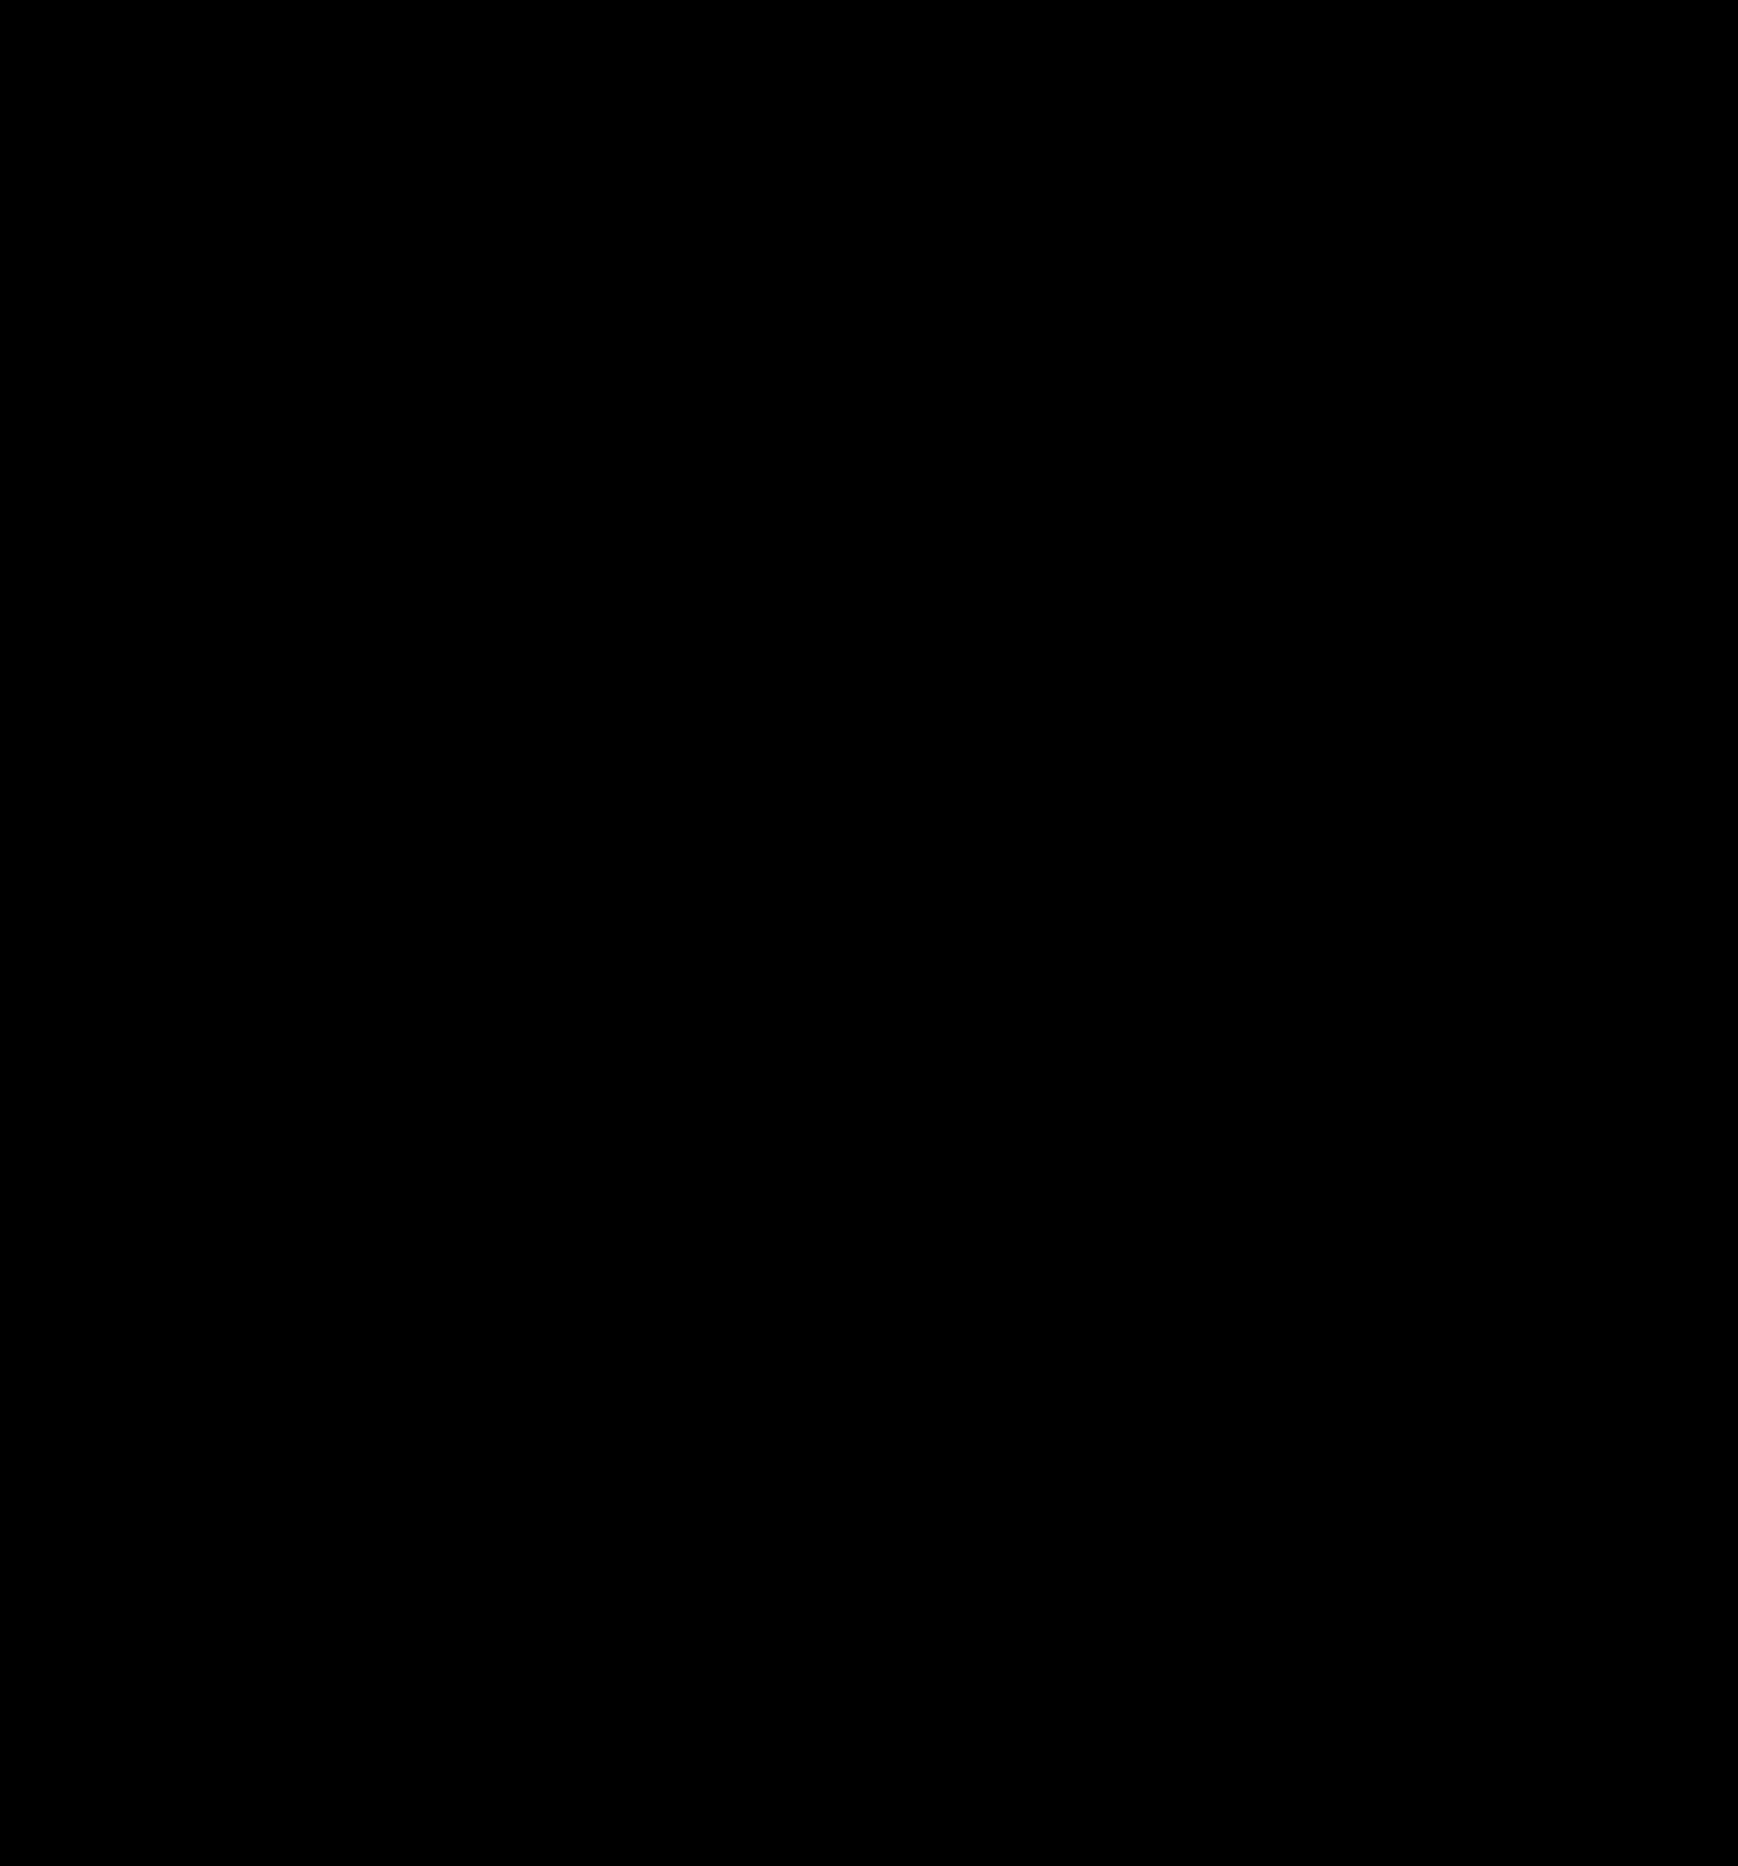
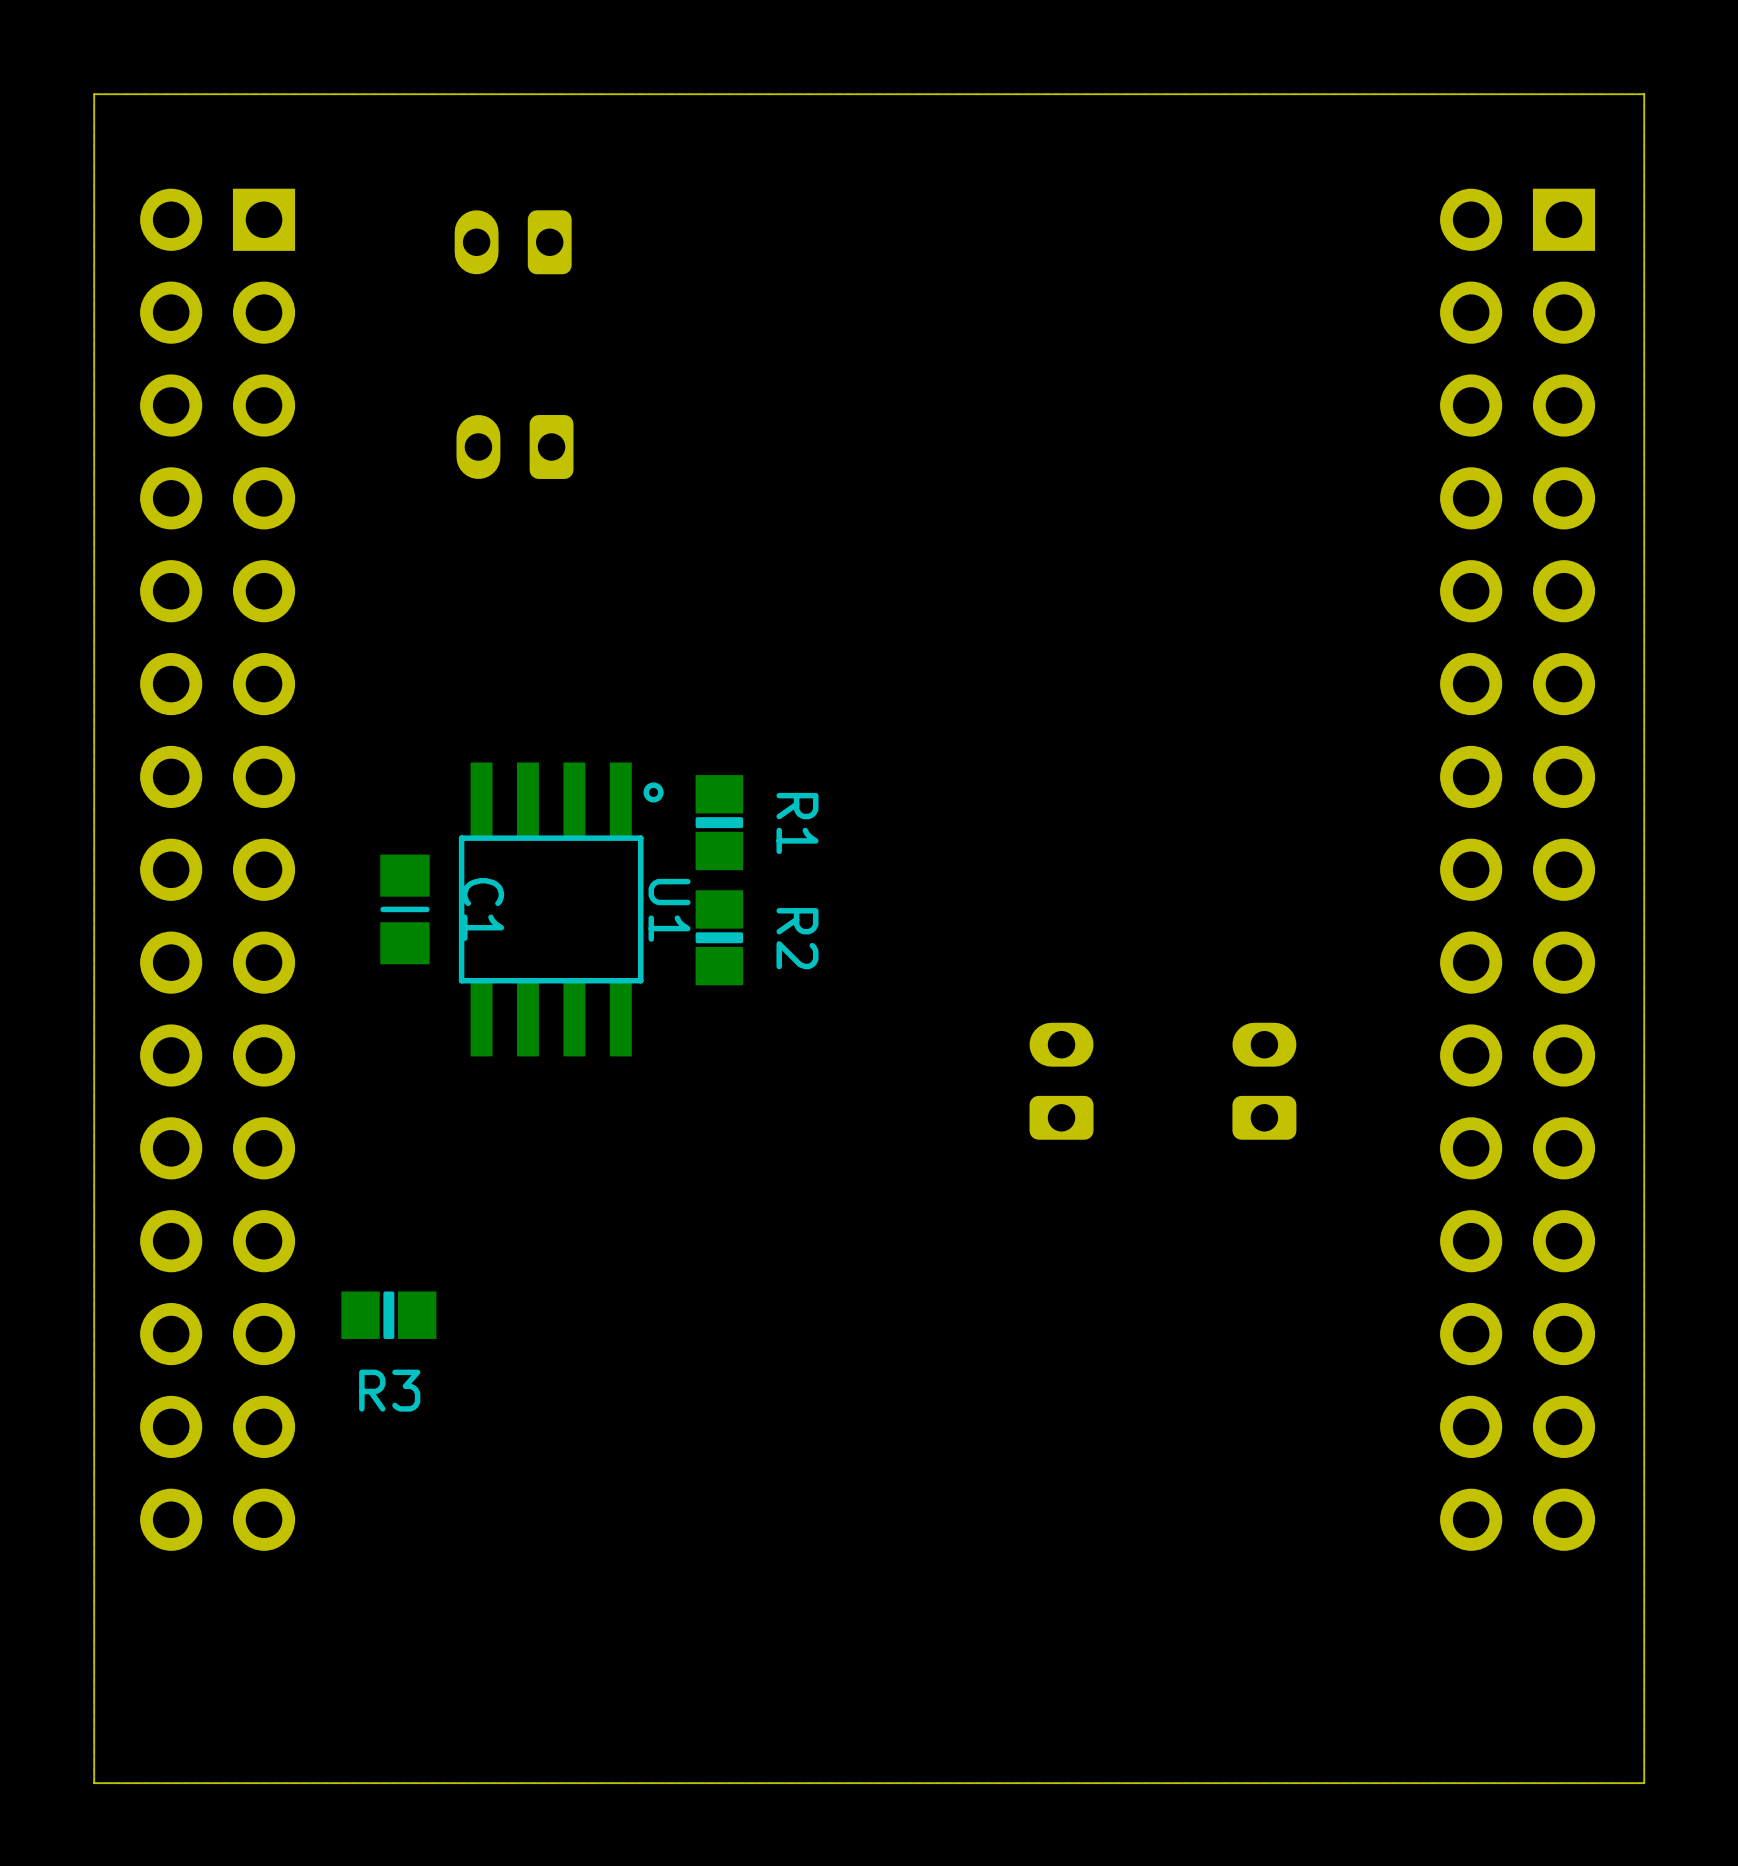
board edge: none -> (1644, 94) (1644, 1783) (94, 1783) (94, 94) (1644, 94)
part: none -> (513, 242)
part: none -> (514, 446)
R1: none -> (719, 822)
part: none -> (217, 869)
part: none -> (1517, 869)
C1: none -> (404, 909)
U1: none -> (561, 909)
R2: none -> (719, 937)
part: none -> (1061, 1081)
part: none -> (1264, 1081)
R3: none -> (388, 1315)

